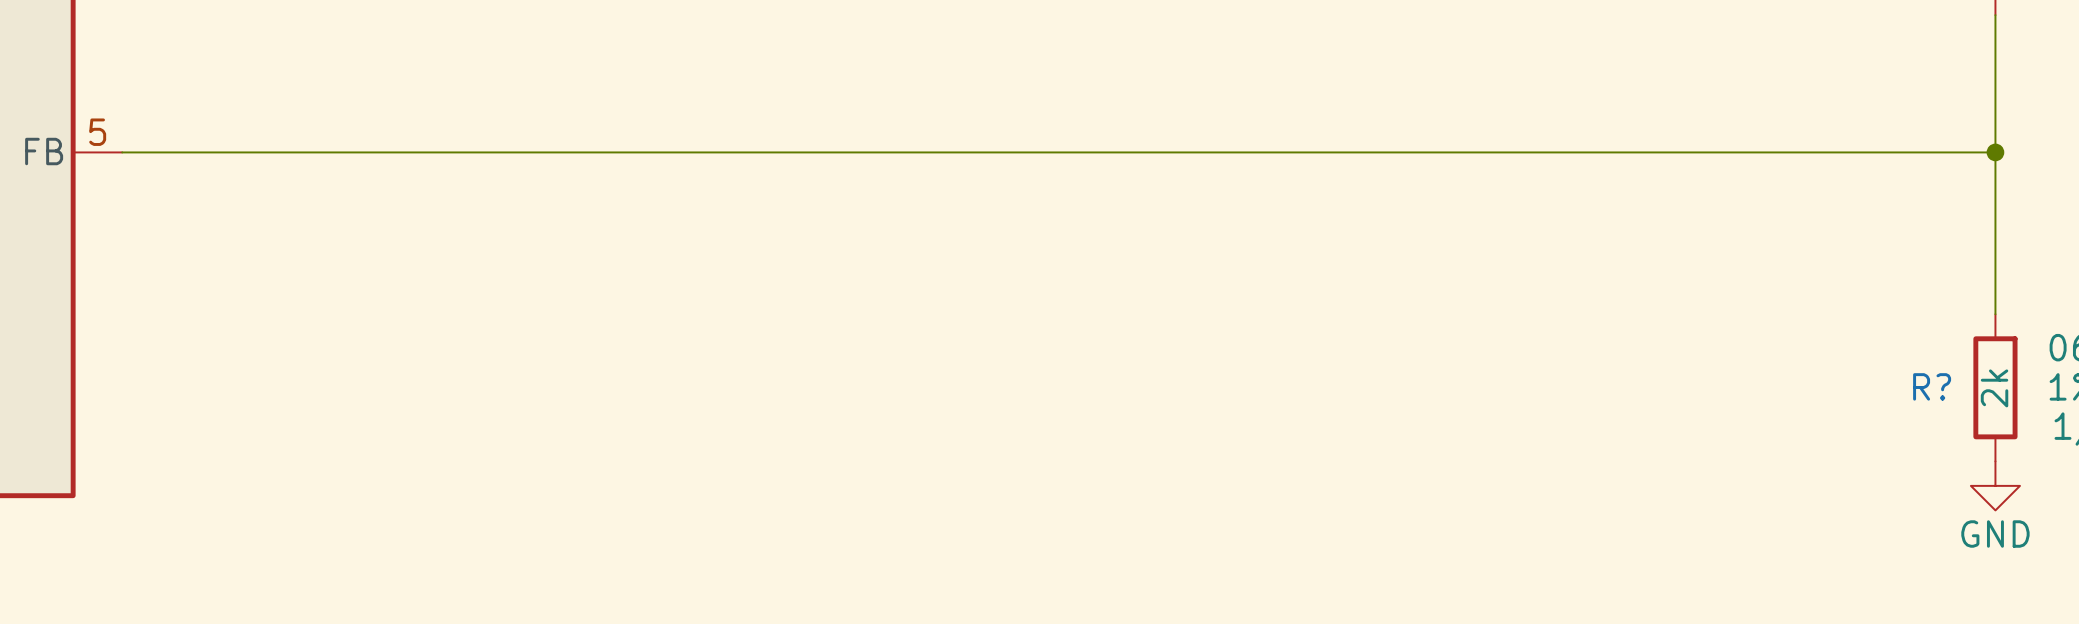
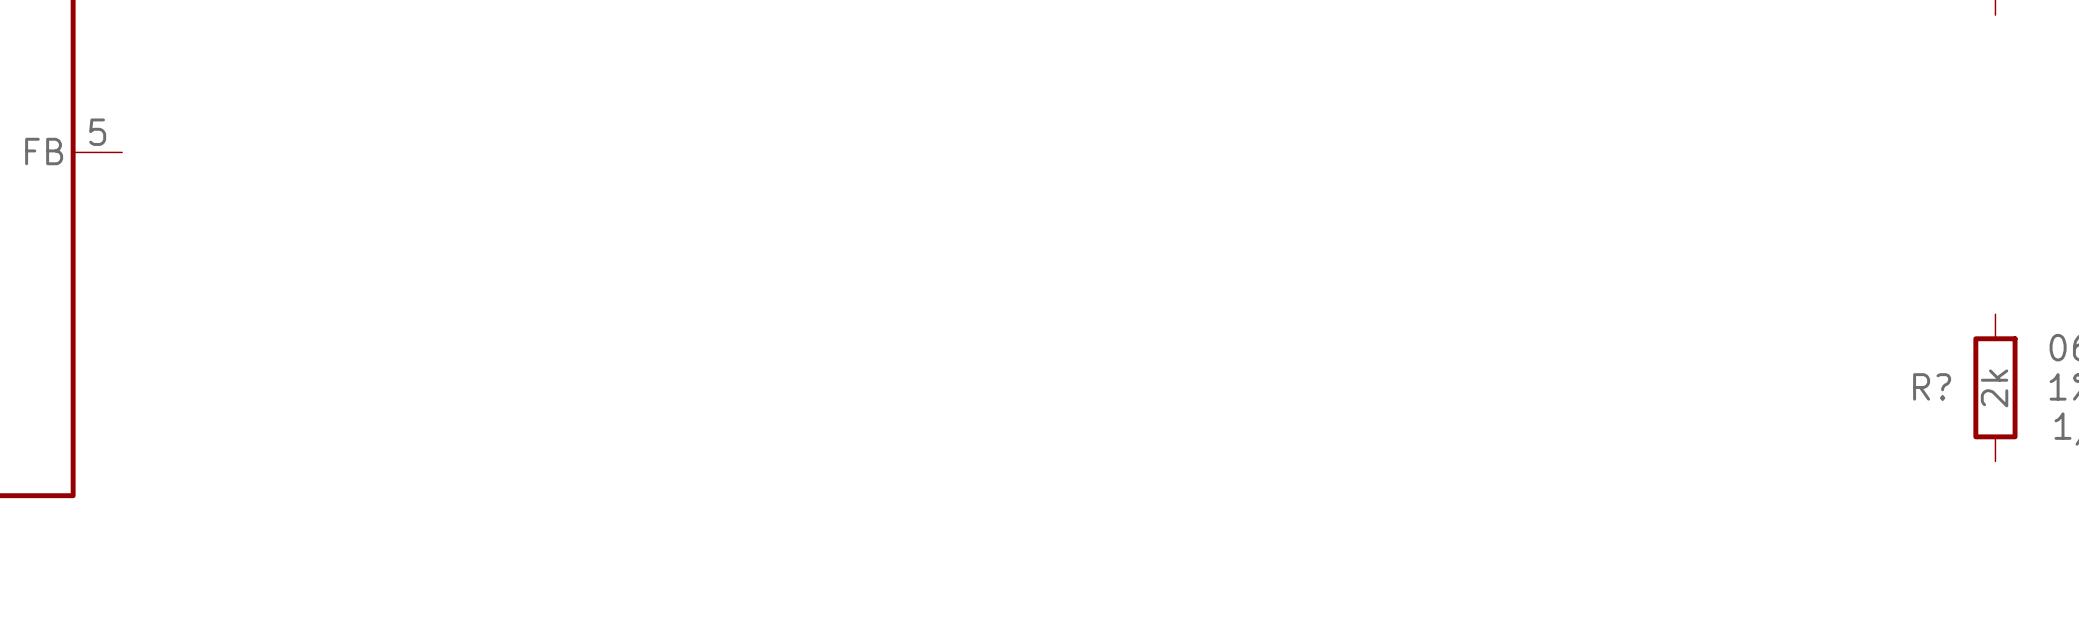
wire: (1995, 15) (1995, 314) -> none
wire: (122, 152) (1995, 152) -> none
junction: (1995, 152) -> none
power symbol: GND (1995, 485) -> none

